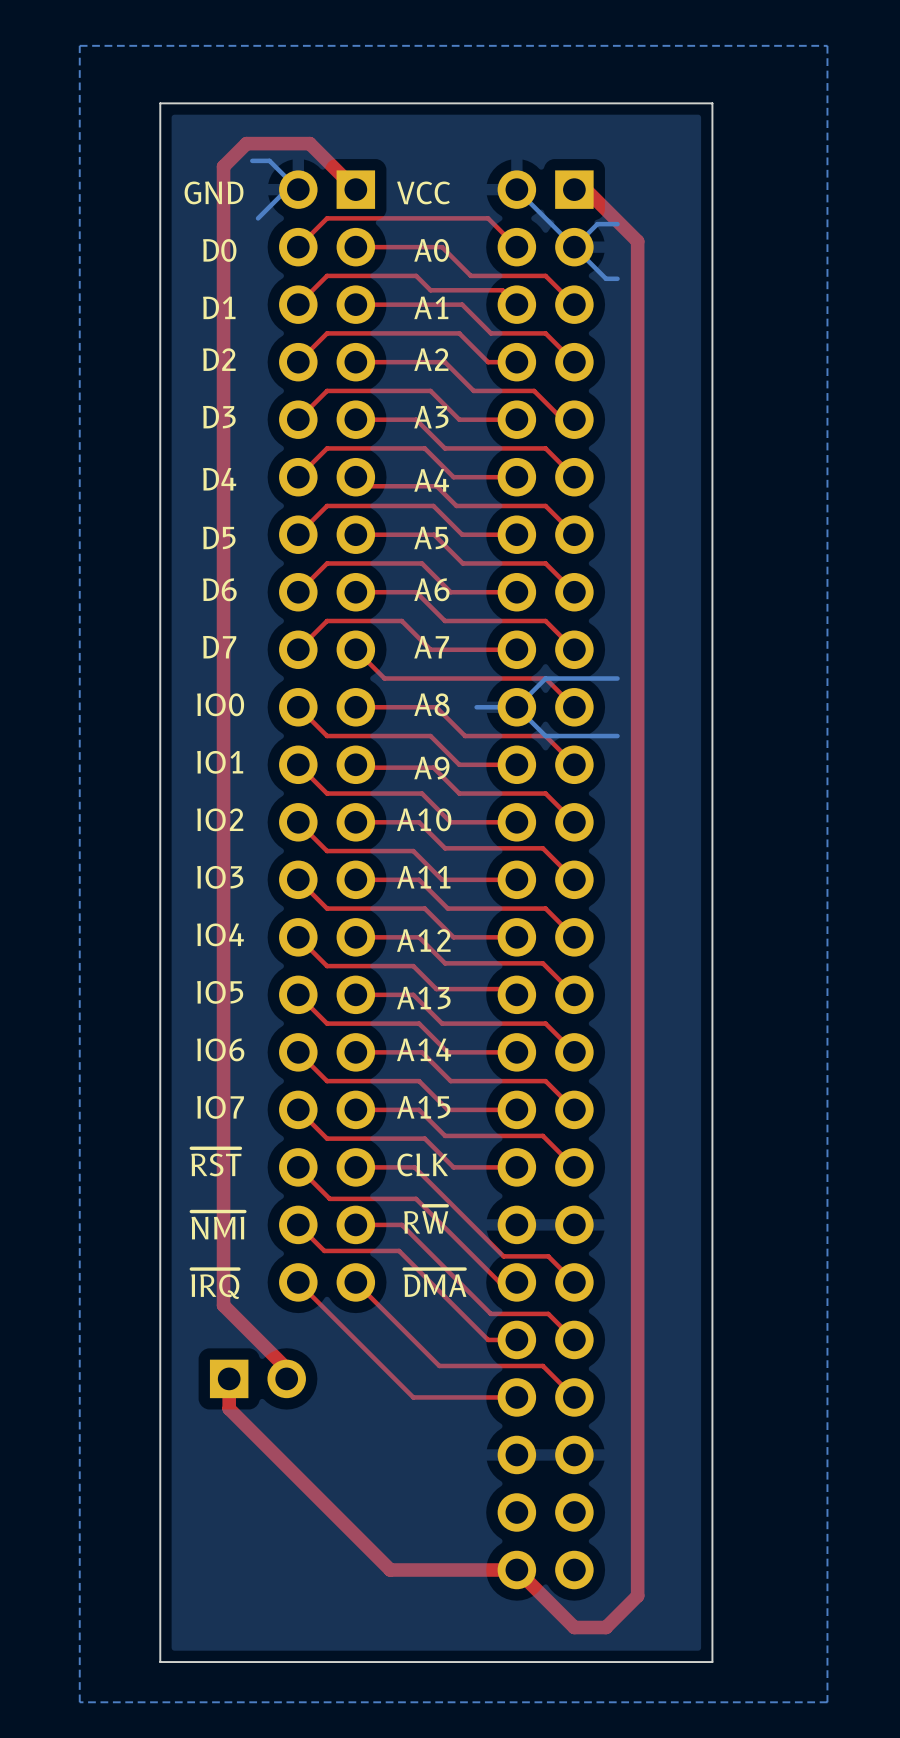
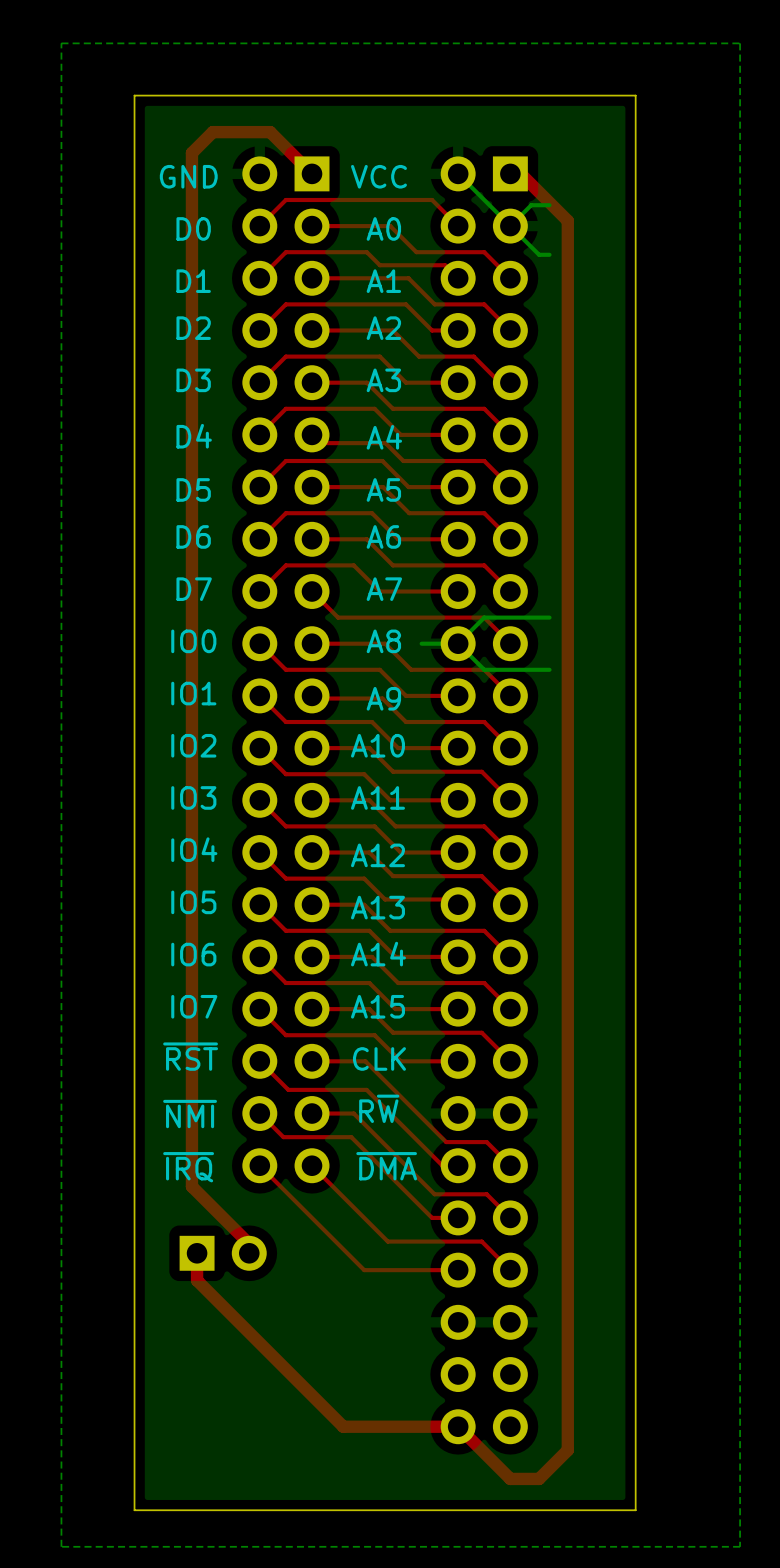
bottom track: (252, 160) (269, 160) (298, 189) (286, 189) (258, 218) -> none

